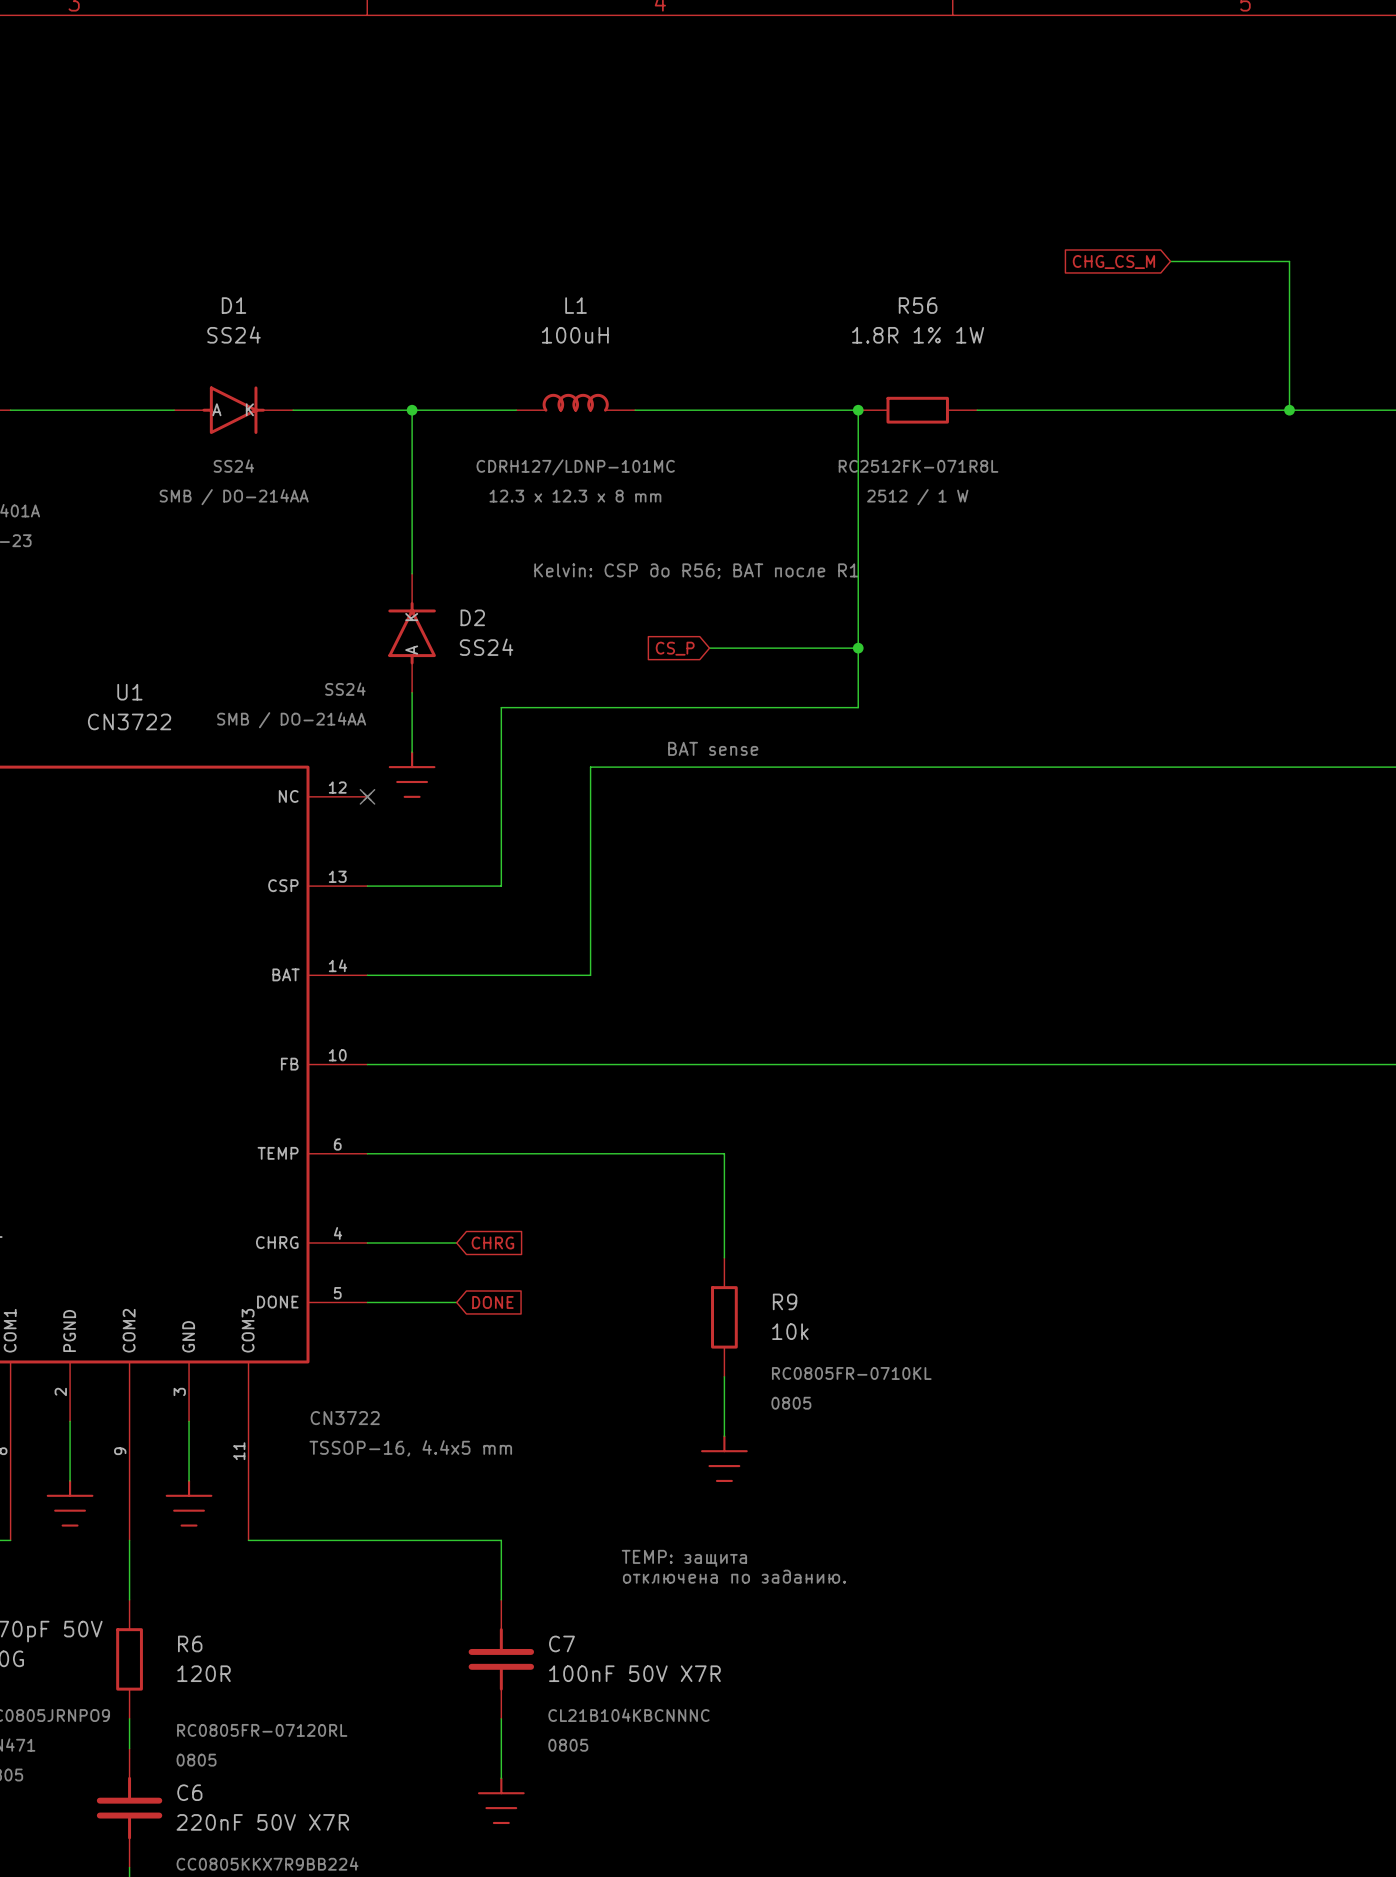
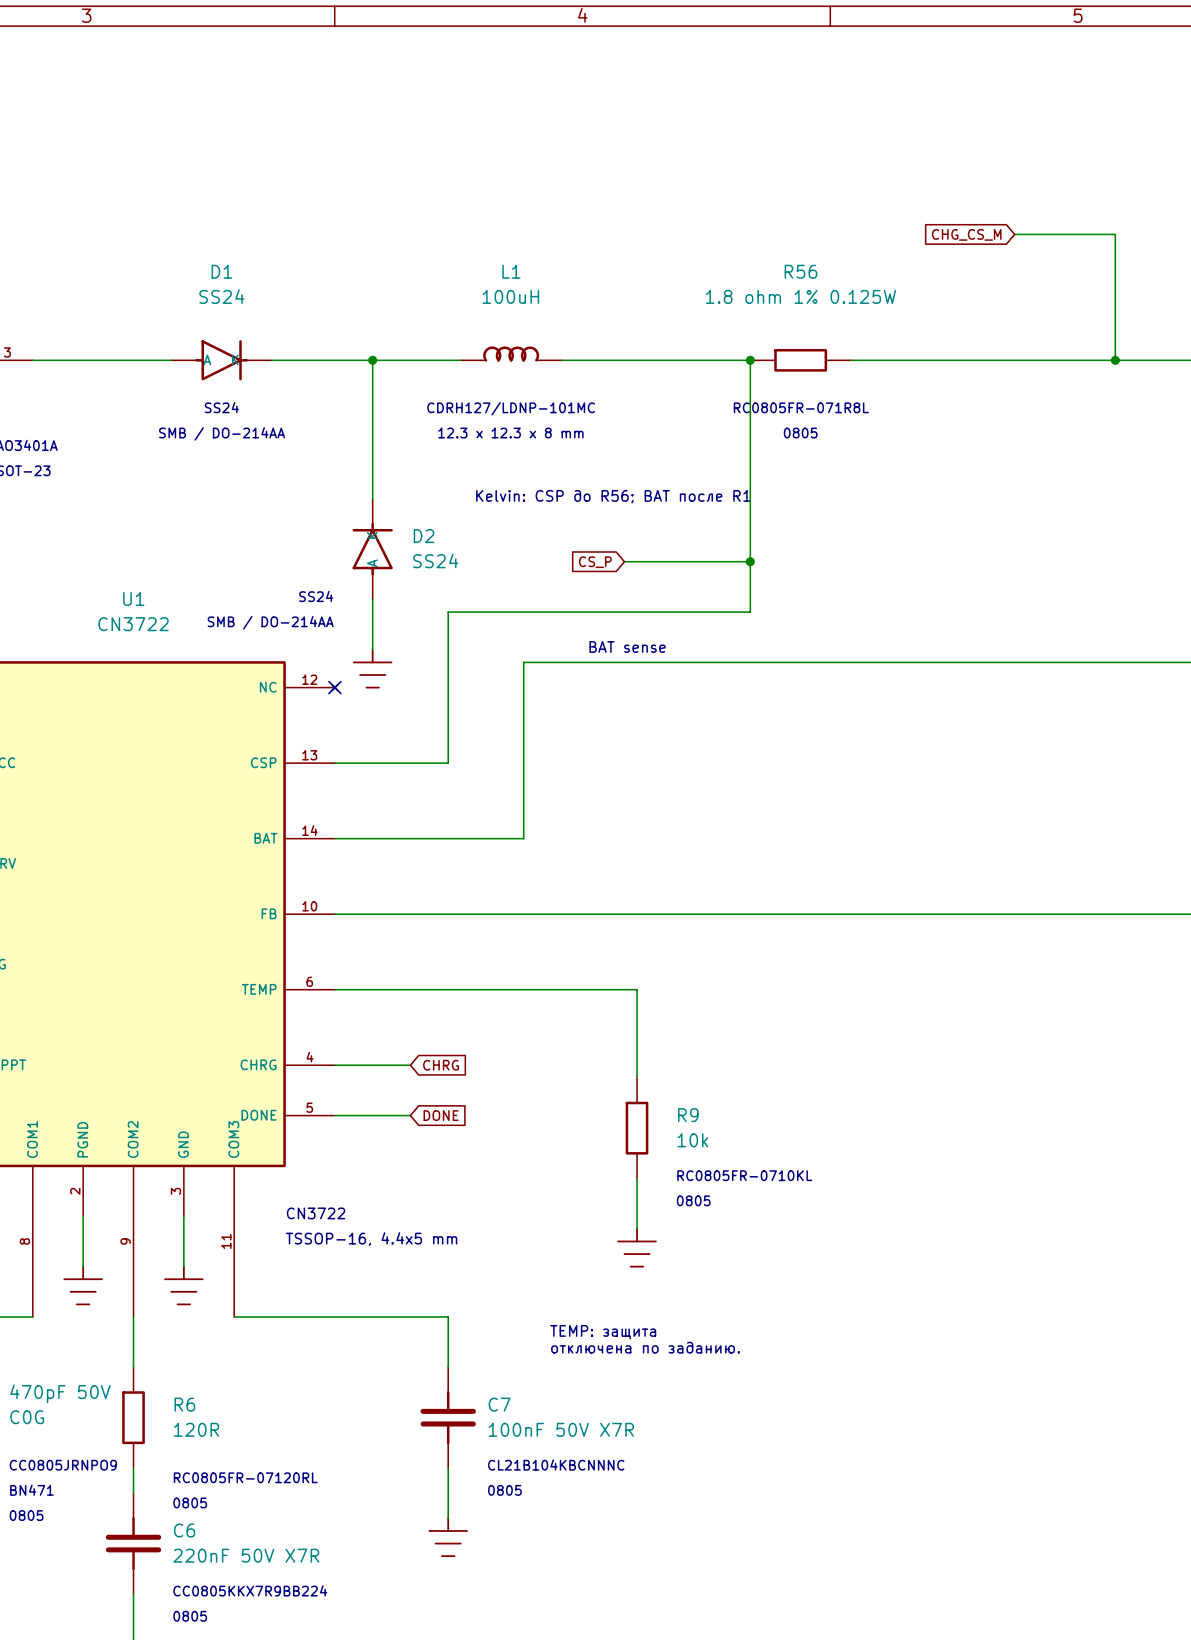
R56 value: 1.8R 1% 1W (918, 335) -> 1.8 ohm 1% 0.125W (800, 296)
text: RC2512FK-071R8L (918, 466) -> RC0805FR-071R8L (801, 407)
text: 2512 / 1 W (917, 497) -> 0805 (800, 433)

